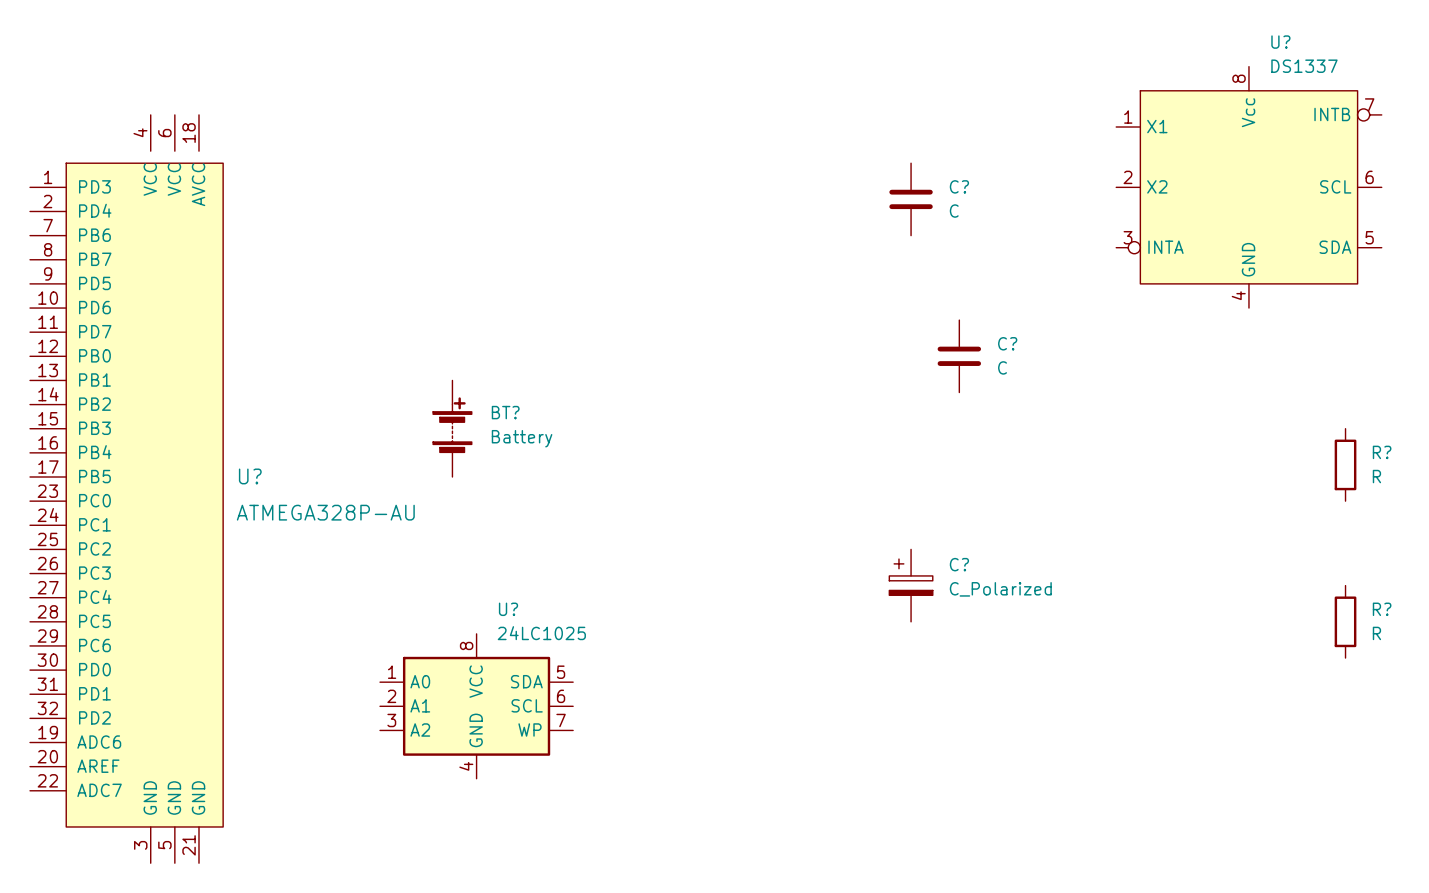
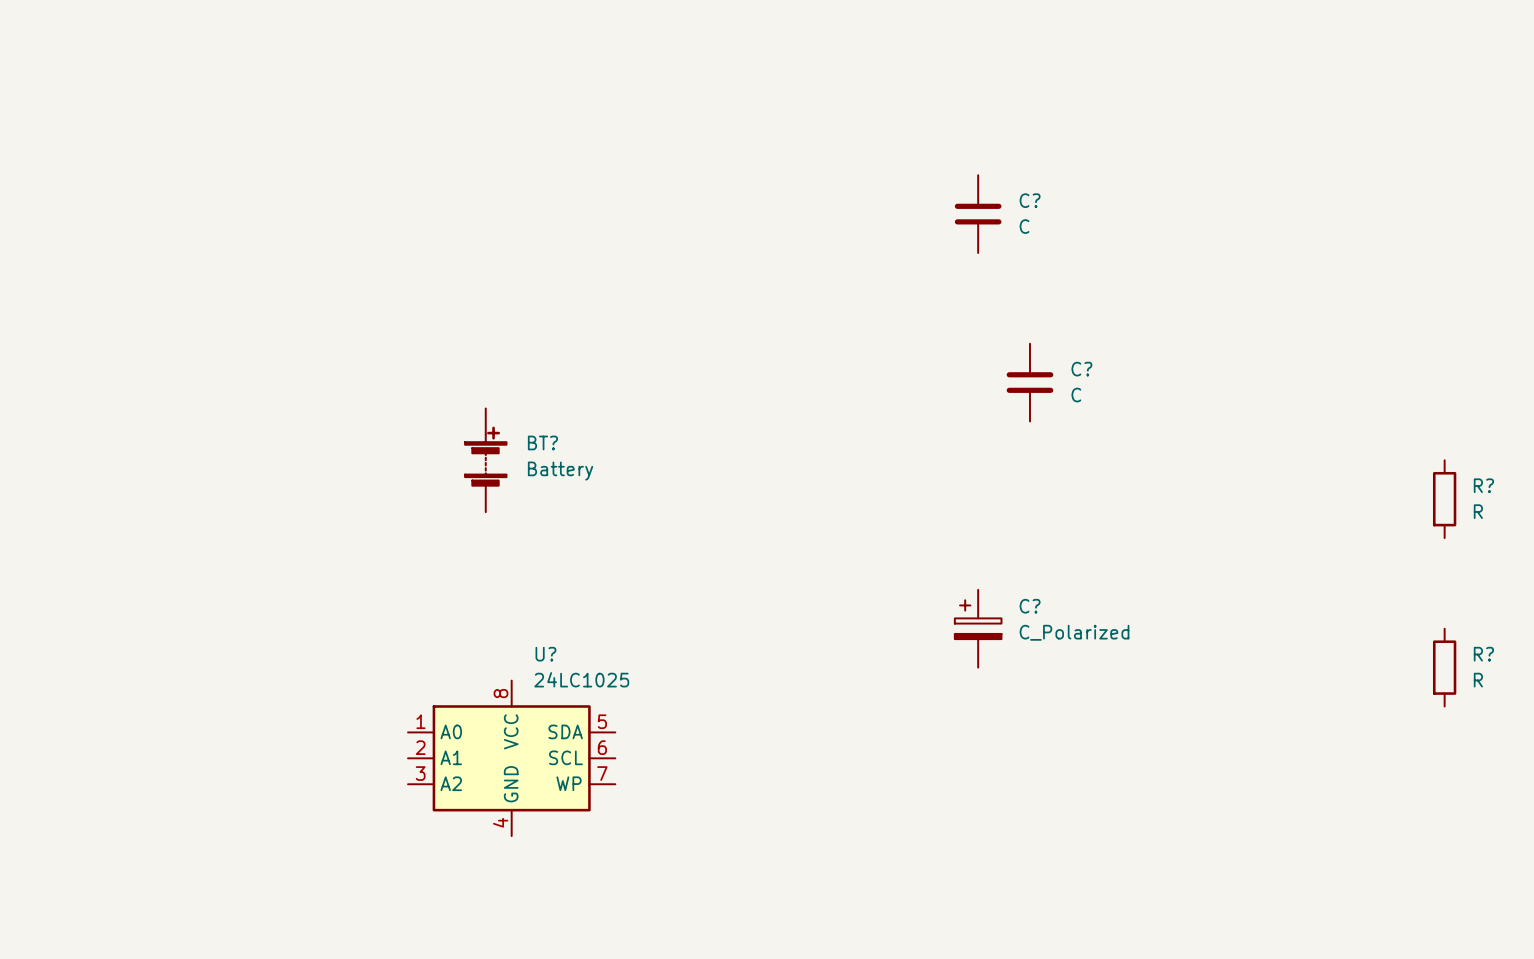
U?: DS1337 (1248, 187) -> none
U?: ATMEGA328P-AU (126, 489) -> none

